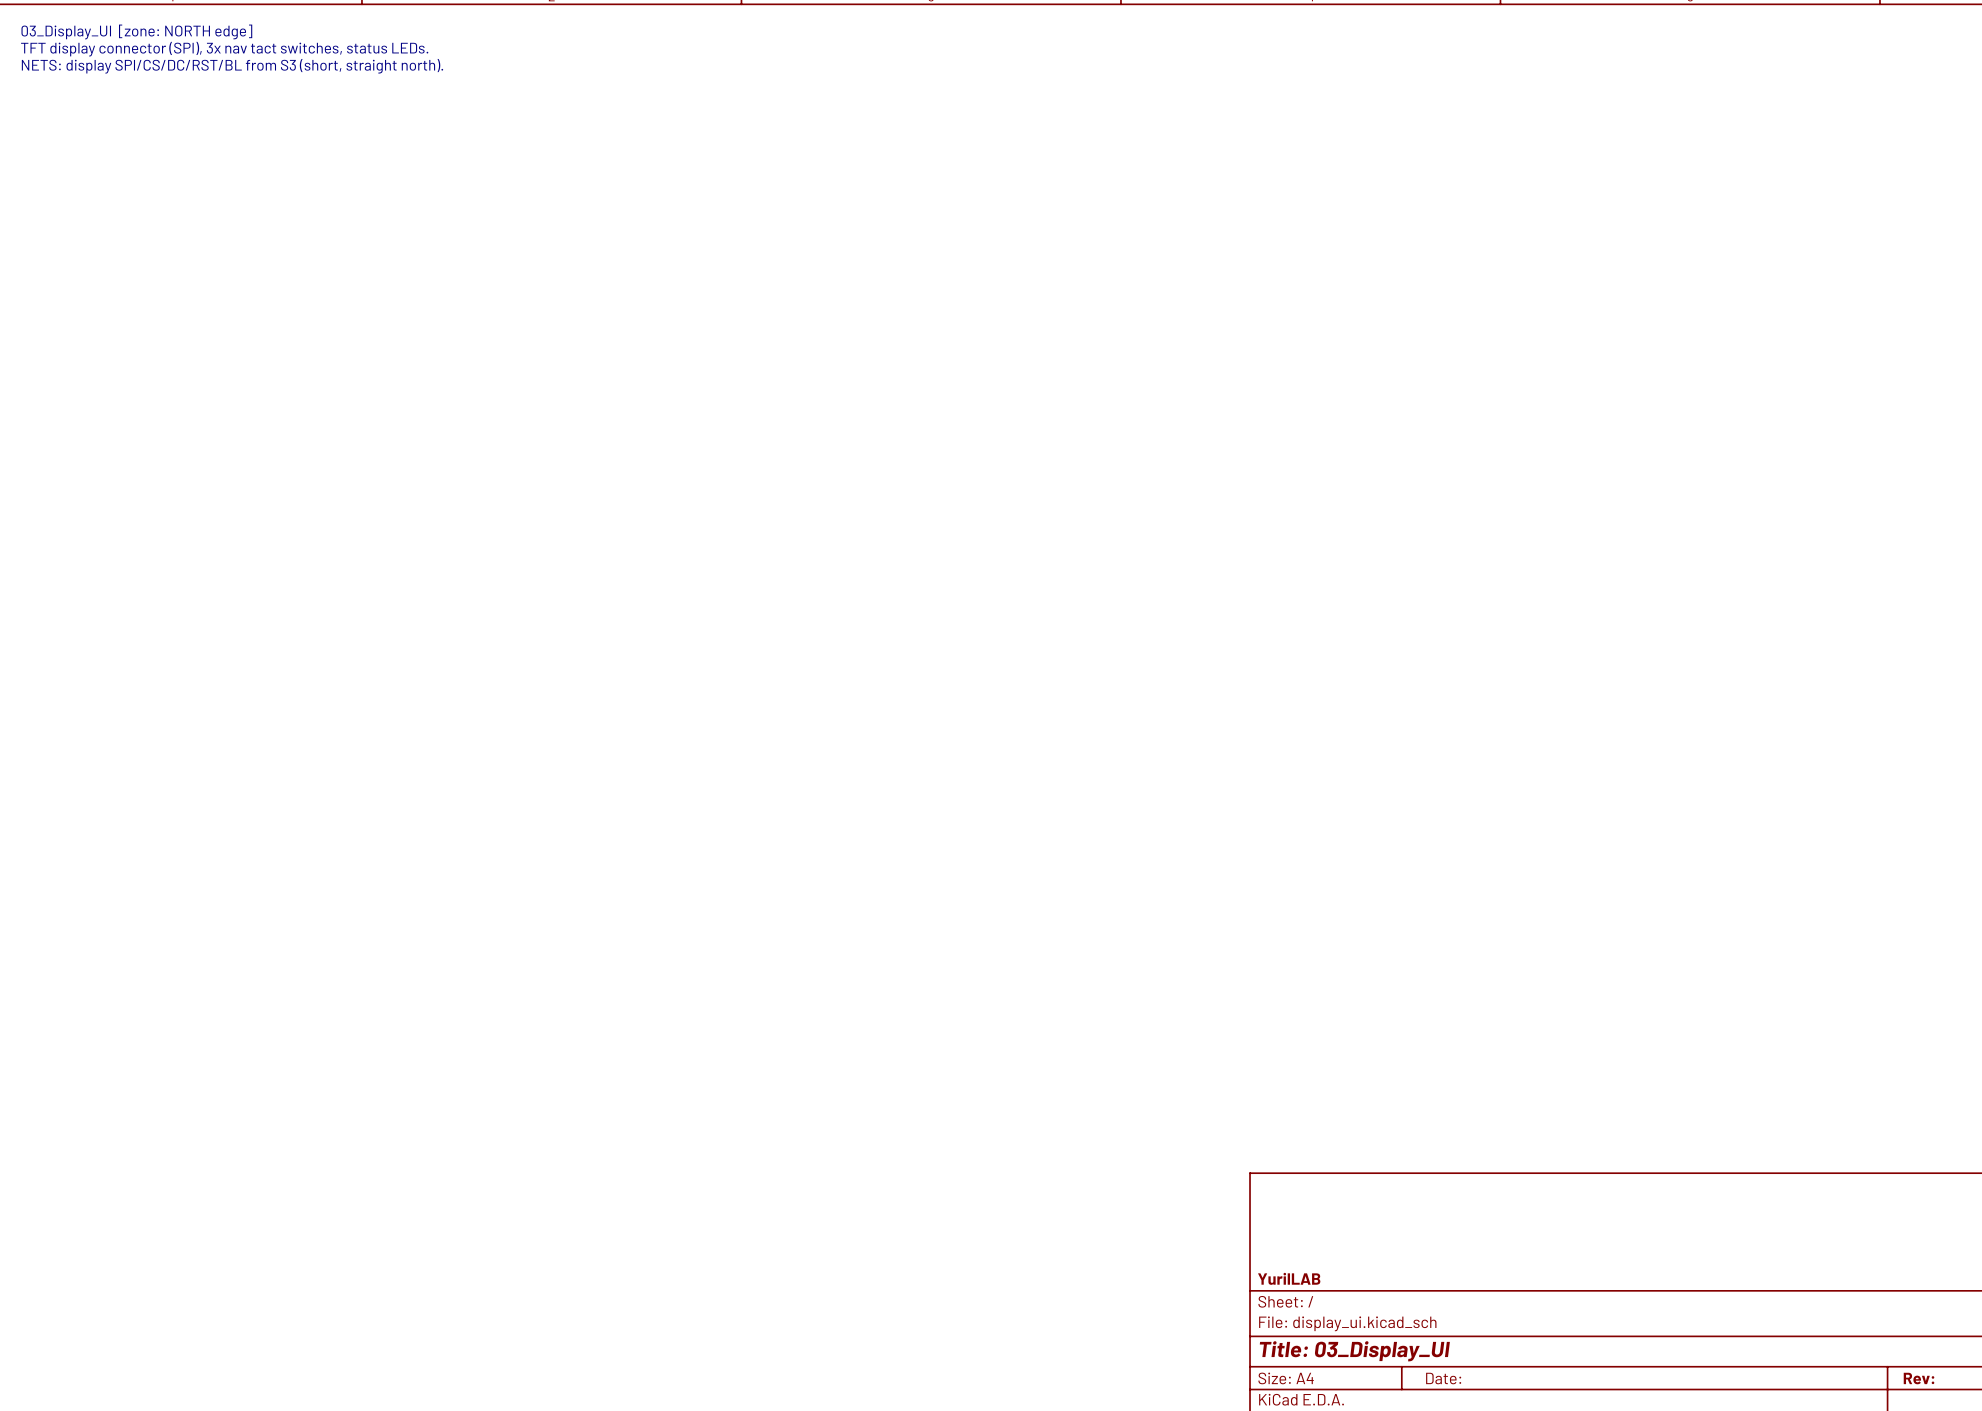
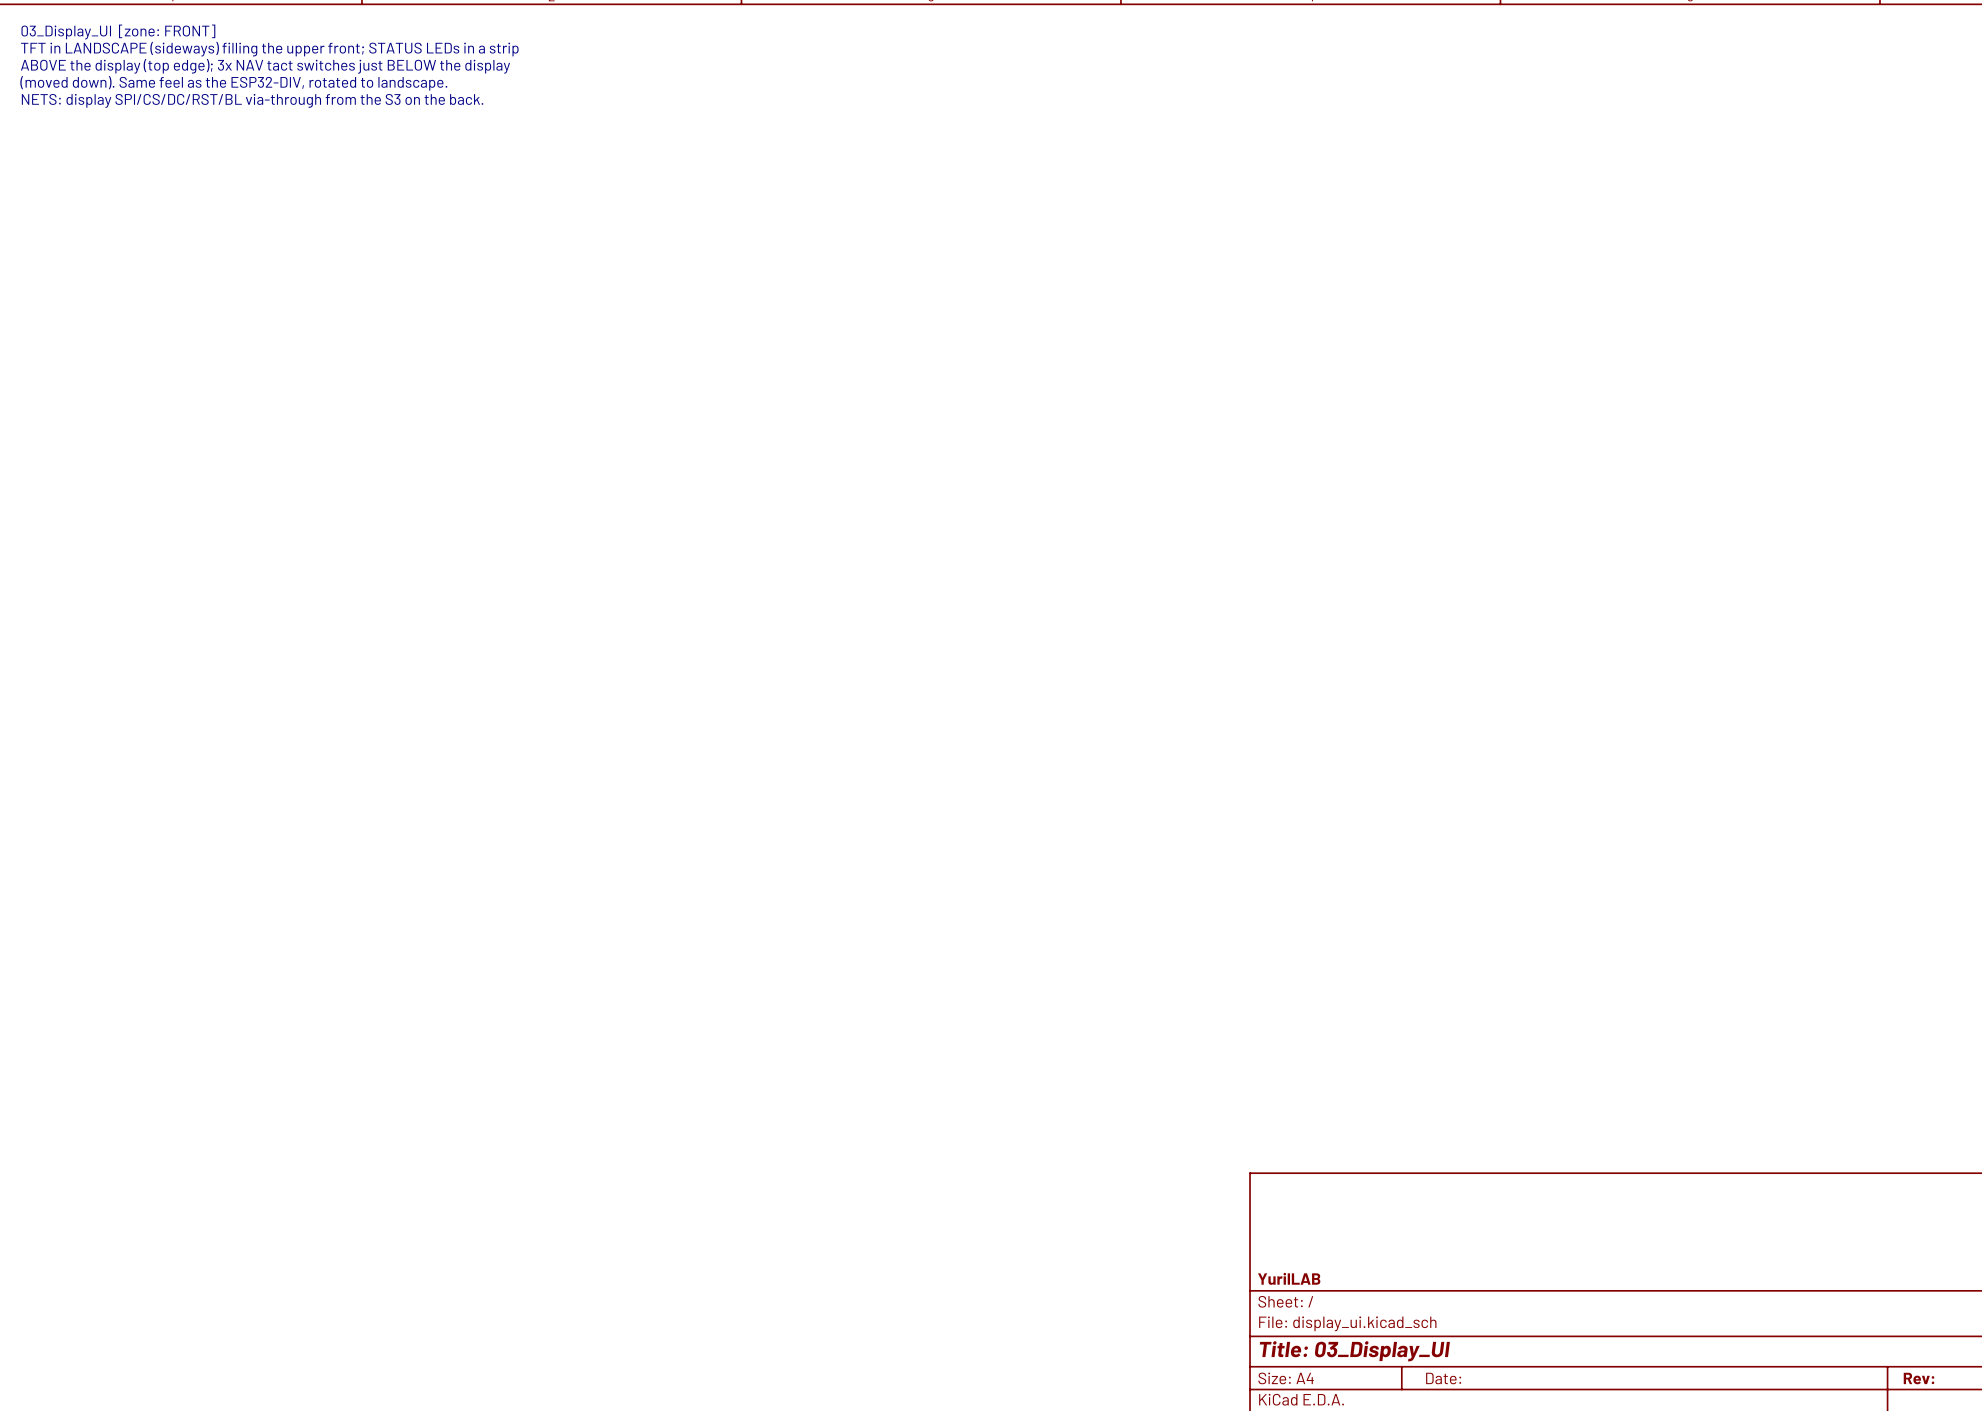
text: 03_Display_UI [zone: NORTH edge] (136, 31) -> 03_Display_UI [zone: FRONT] (118, 31)
text: TFT display connector (SPI), 3x nav tact switches, status LEDs. (224, 49) -> TFT in LANDSCAPE (sideways) filling the upper front; STATUS LEDs in a strip (269, 49)
text: NETS: display SPI/CS/DC/RST/BL from S3 (short, straight north). (232, 66) -> ABOVE the display (top edge); 3x NAV tact switches just BELOW the display (265, 66)
text: none -> (moved down). Same feel as the ESP32-DIV, rotated to landscape. (233, 83)
text: none -> NETS: display SPI/CS/DC/RST/BL via-through from the S3 on the back. (252, 100)

